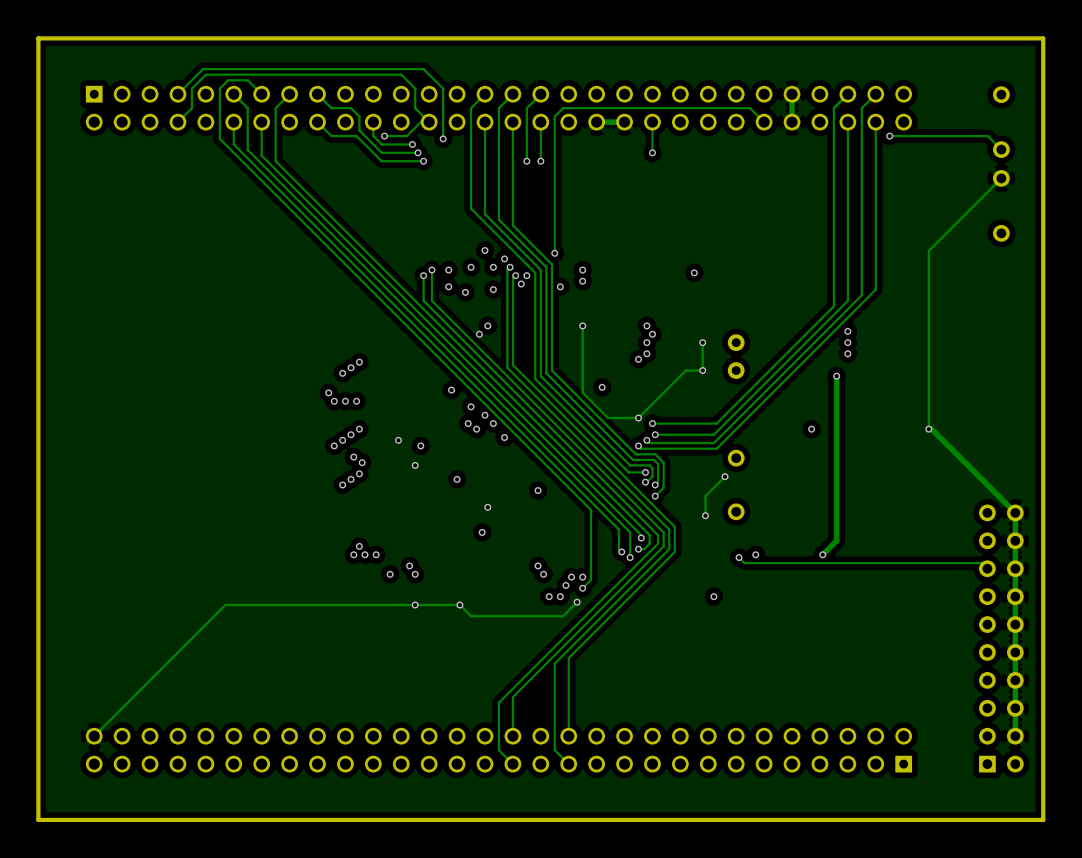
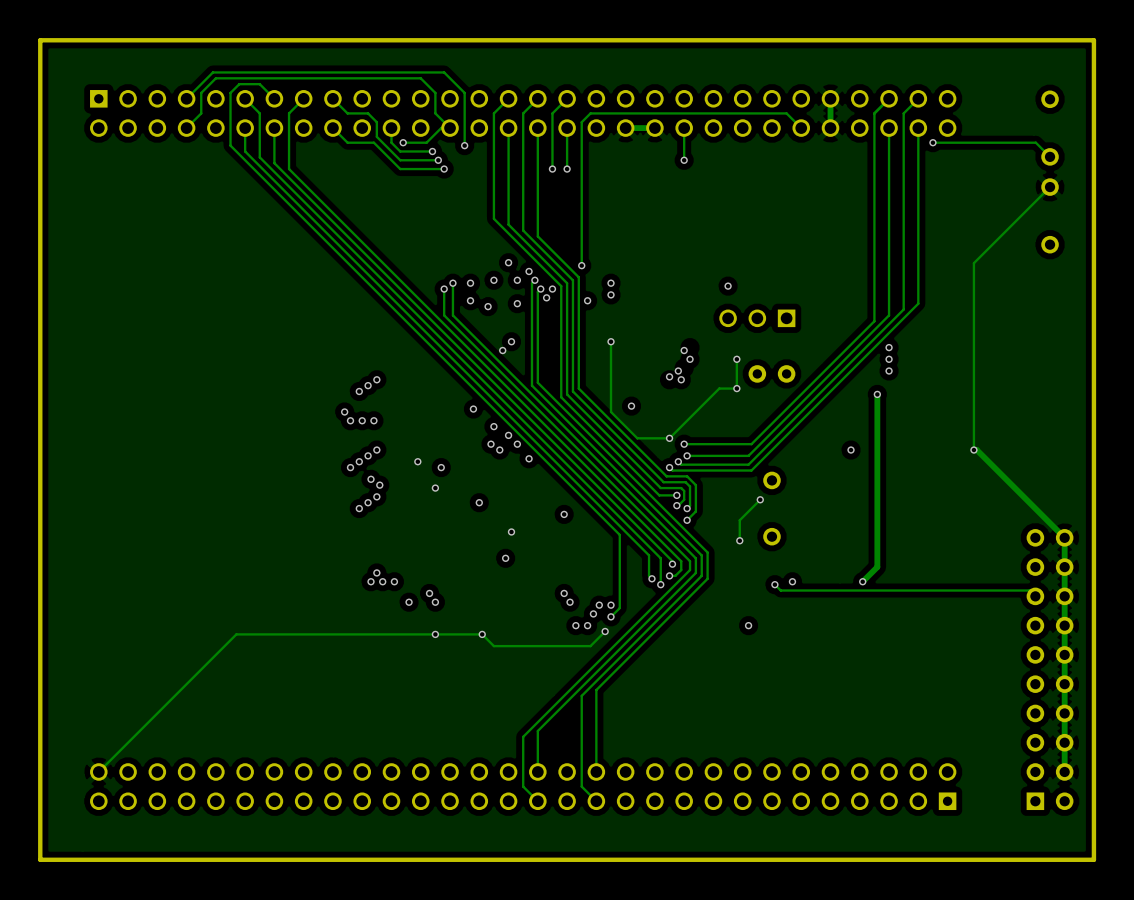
part: none -> (757, 318)
via: (646, 325) -> none
via: (646, 342) -> none
via: none -> (690, 359)
part rotation: 0° (736, 356) -> 90° clockwise (771, 373)
via: none -> (681, 379)

